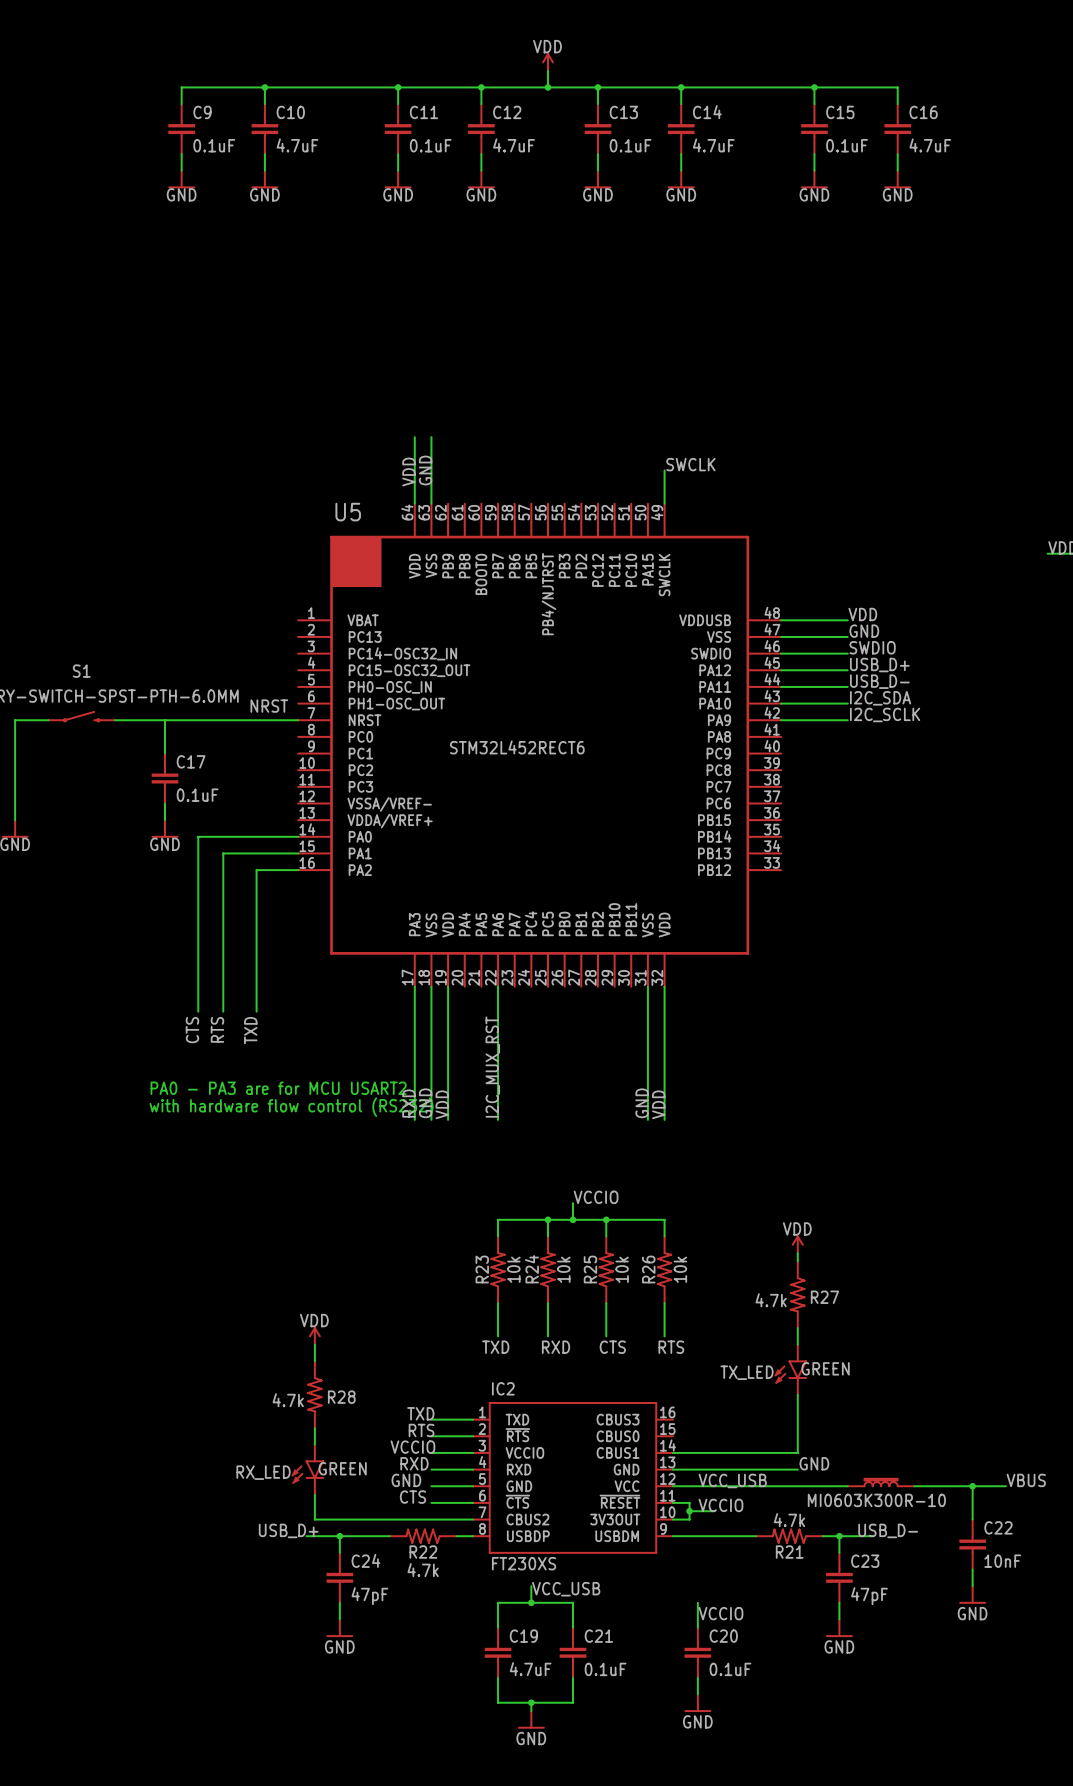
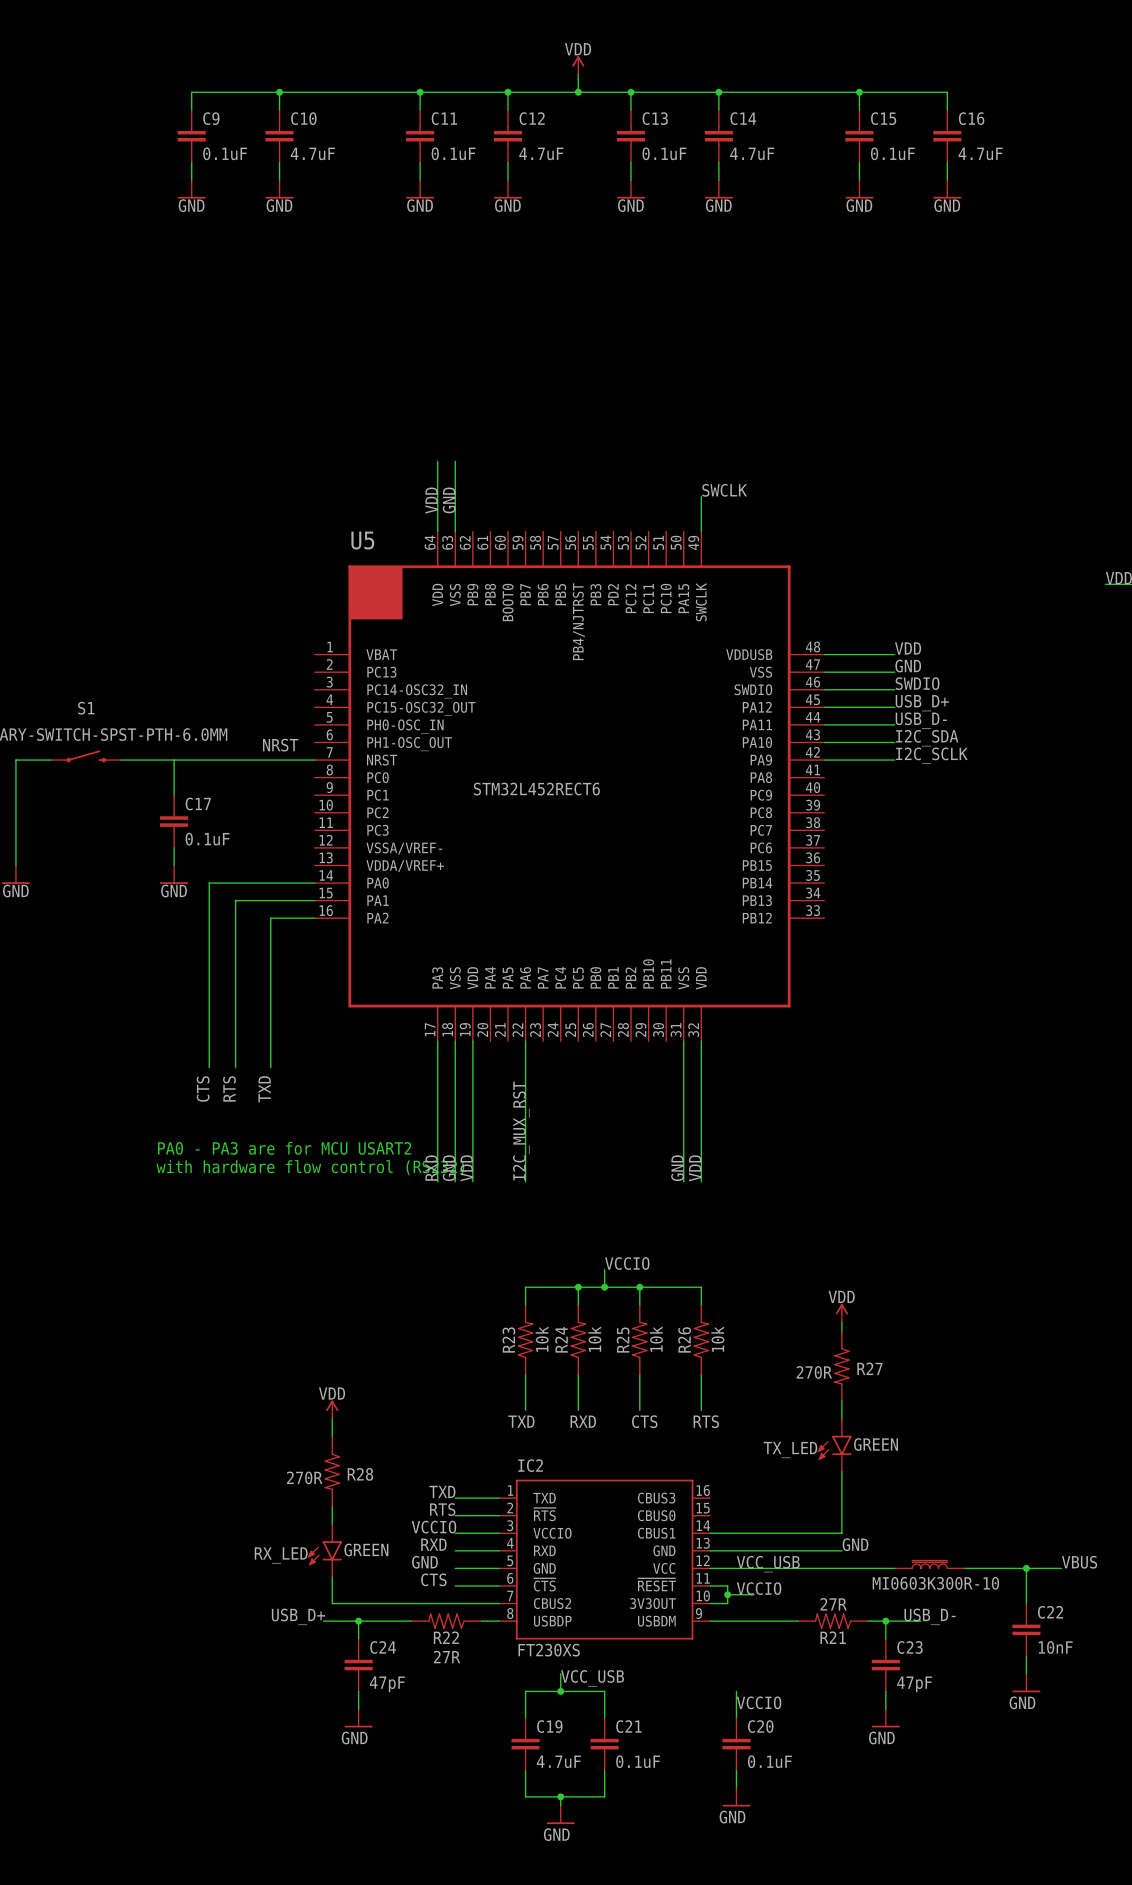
R27 value: 4.7k (771, 1300) -> 270R (814, 1372)
R28 value: 4.7k (288, 1400) -> 270R (304, 1477)
R21 value: 4.7k (789, 1520) -> 27R (833, 1604)
R22 value: 4.7k (423, 1570) -> 27R (447, 1657)

